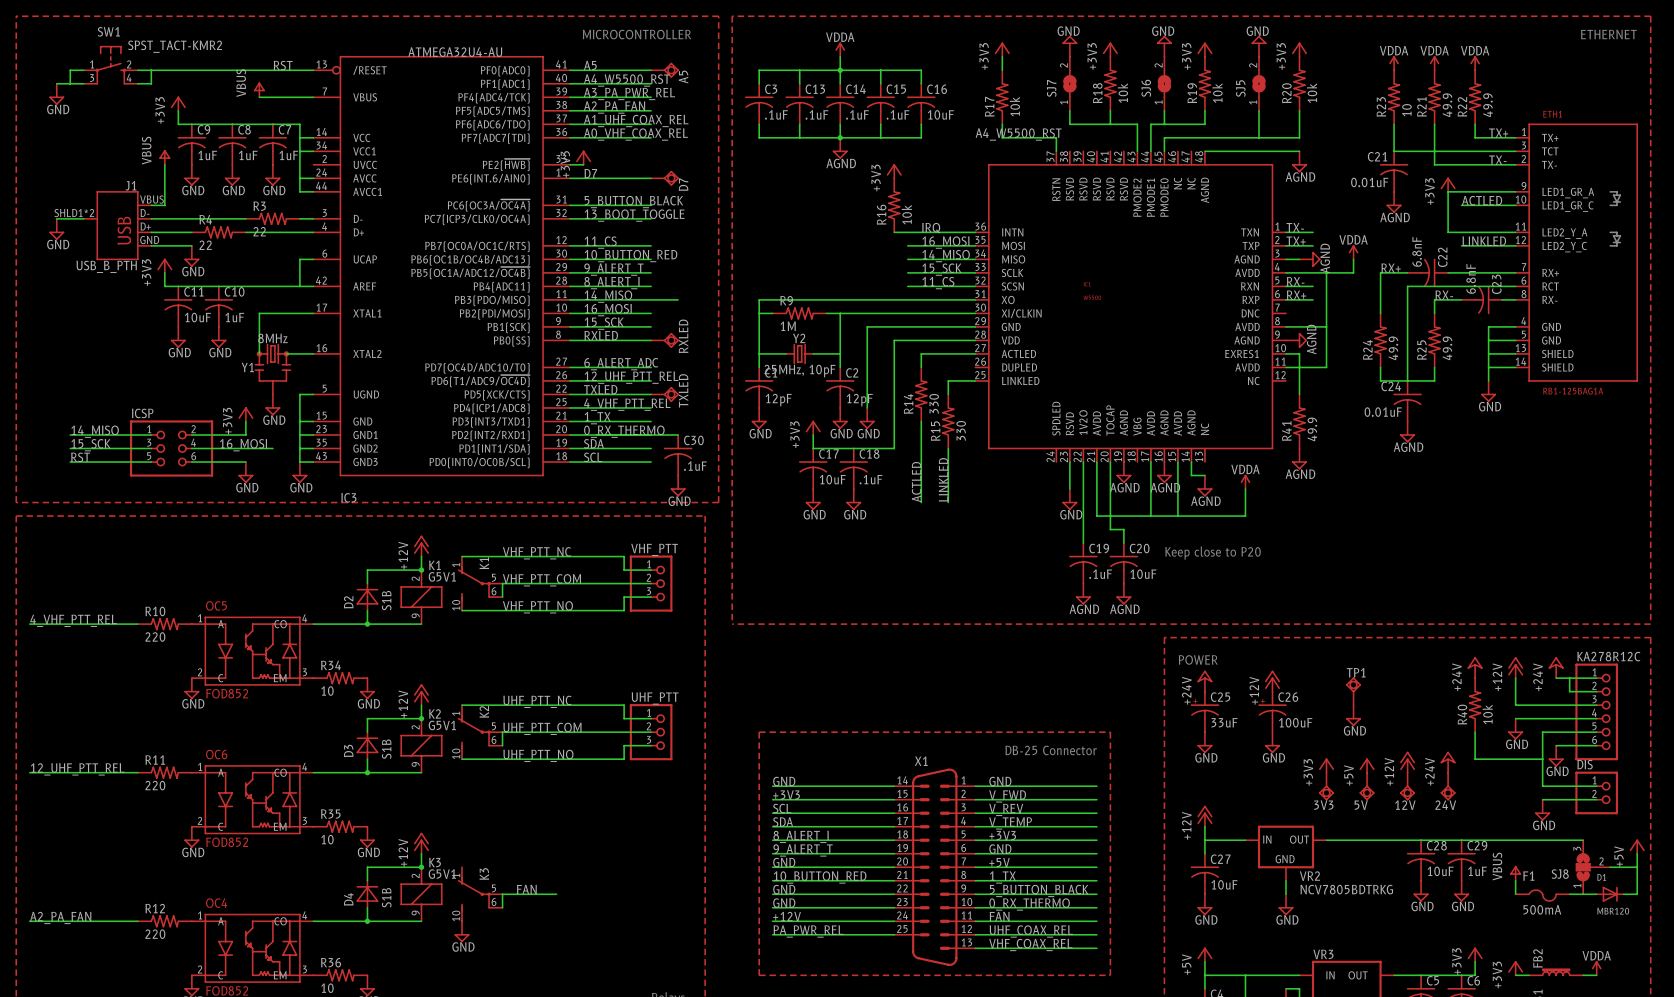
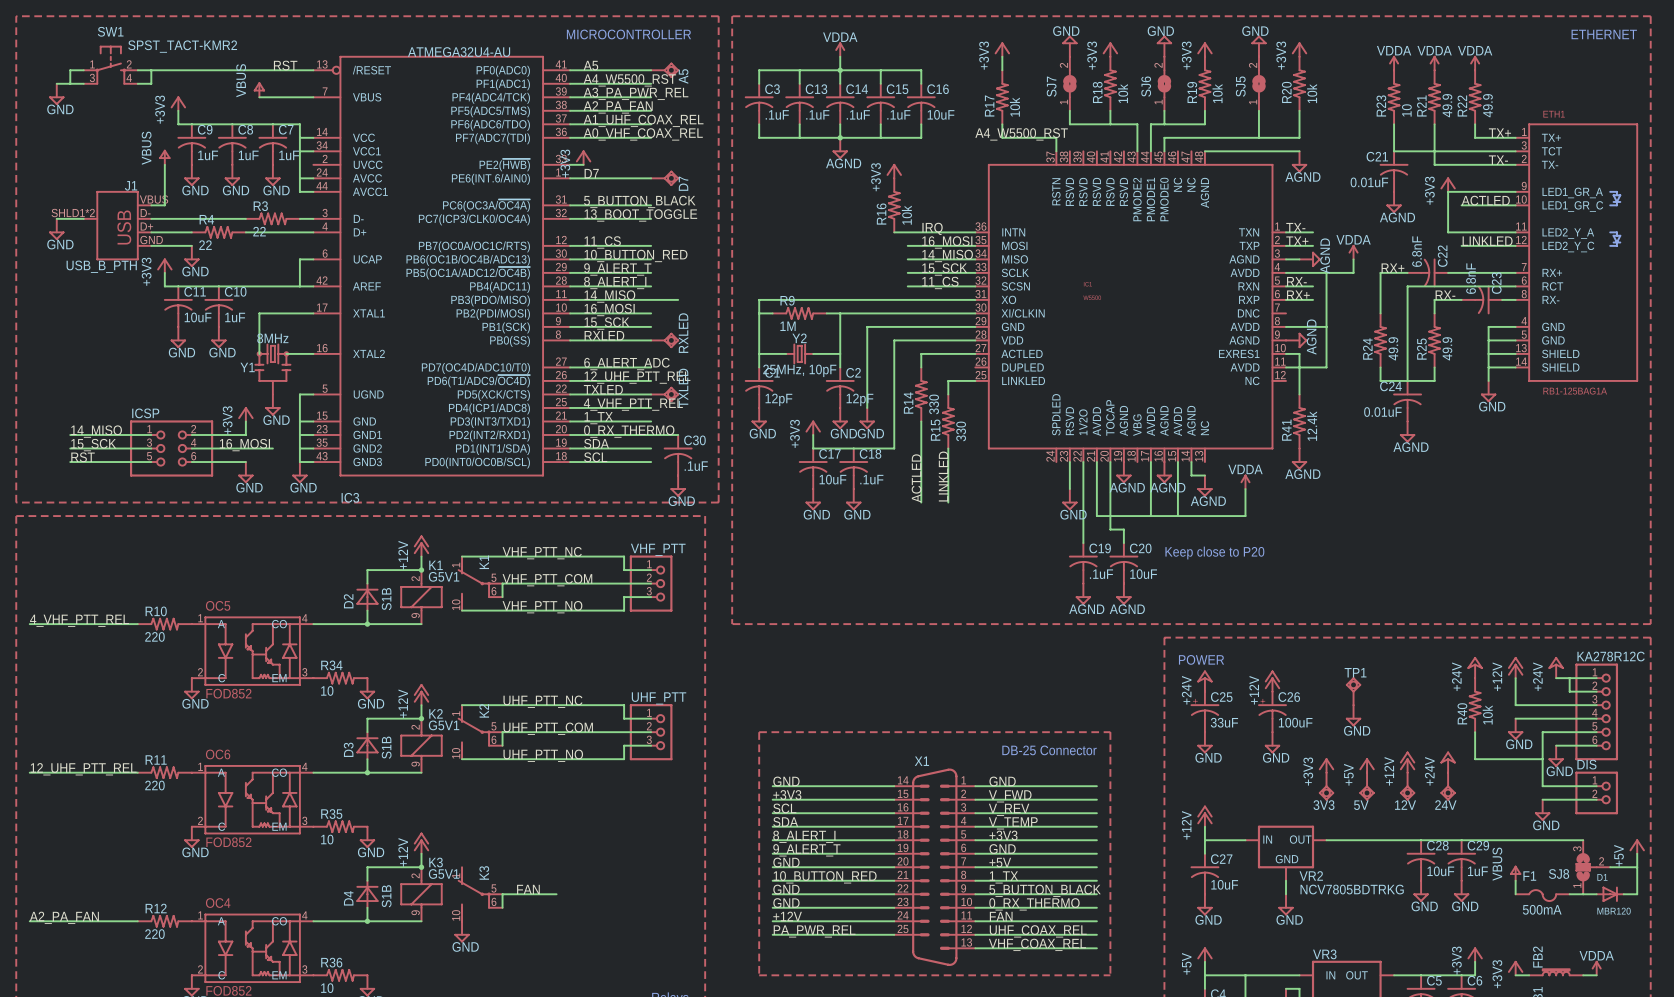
R41 value: 49.9 (1312, 429) -> 12.4k (1312, 426)

